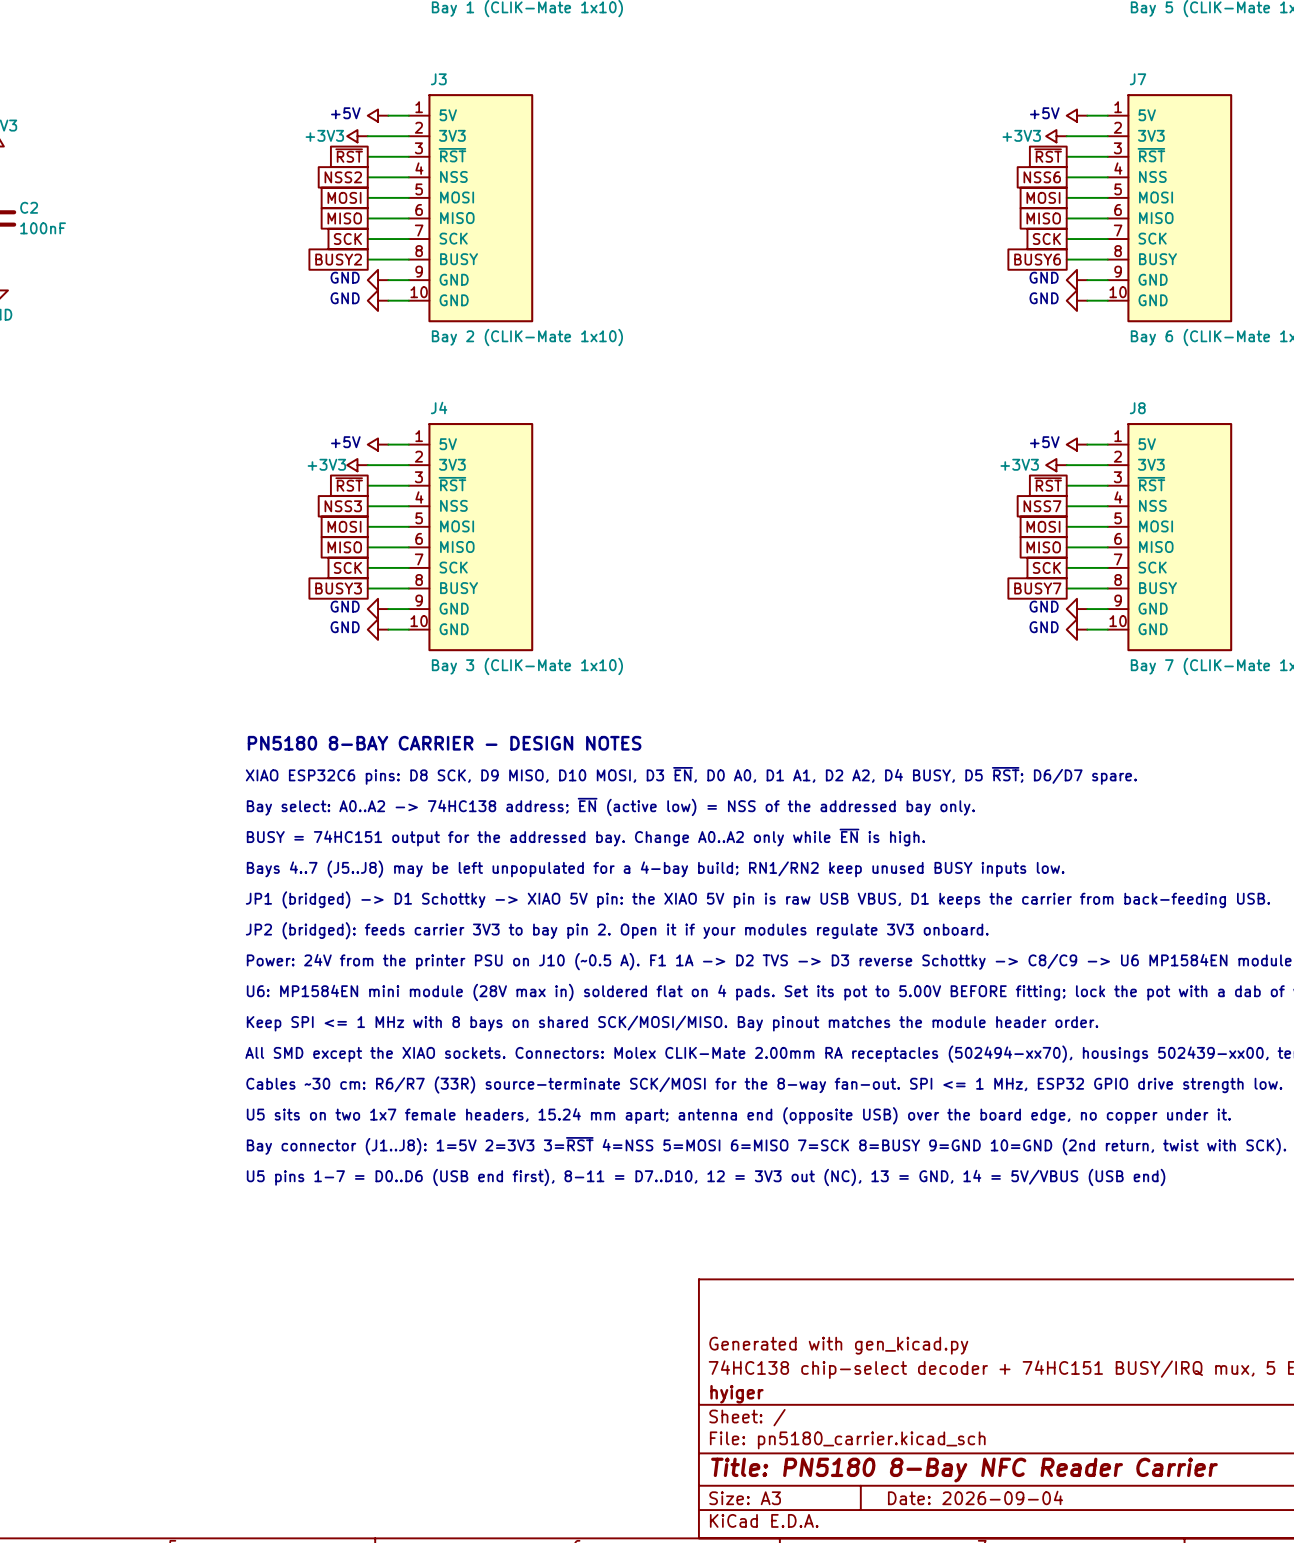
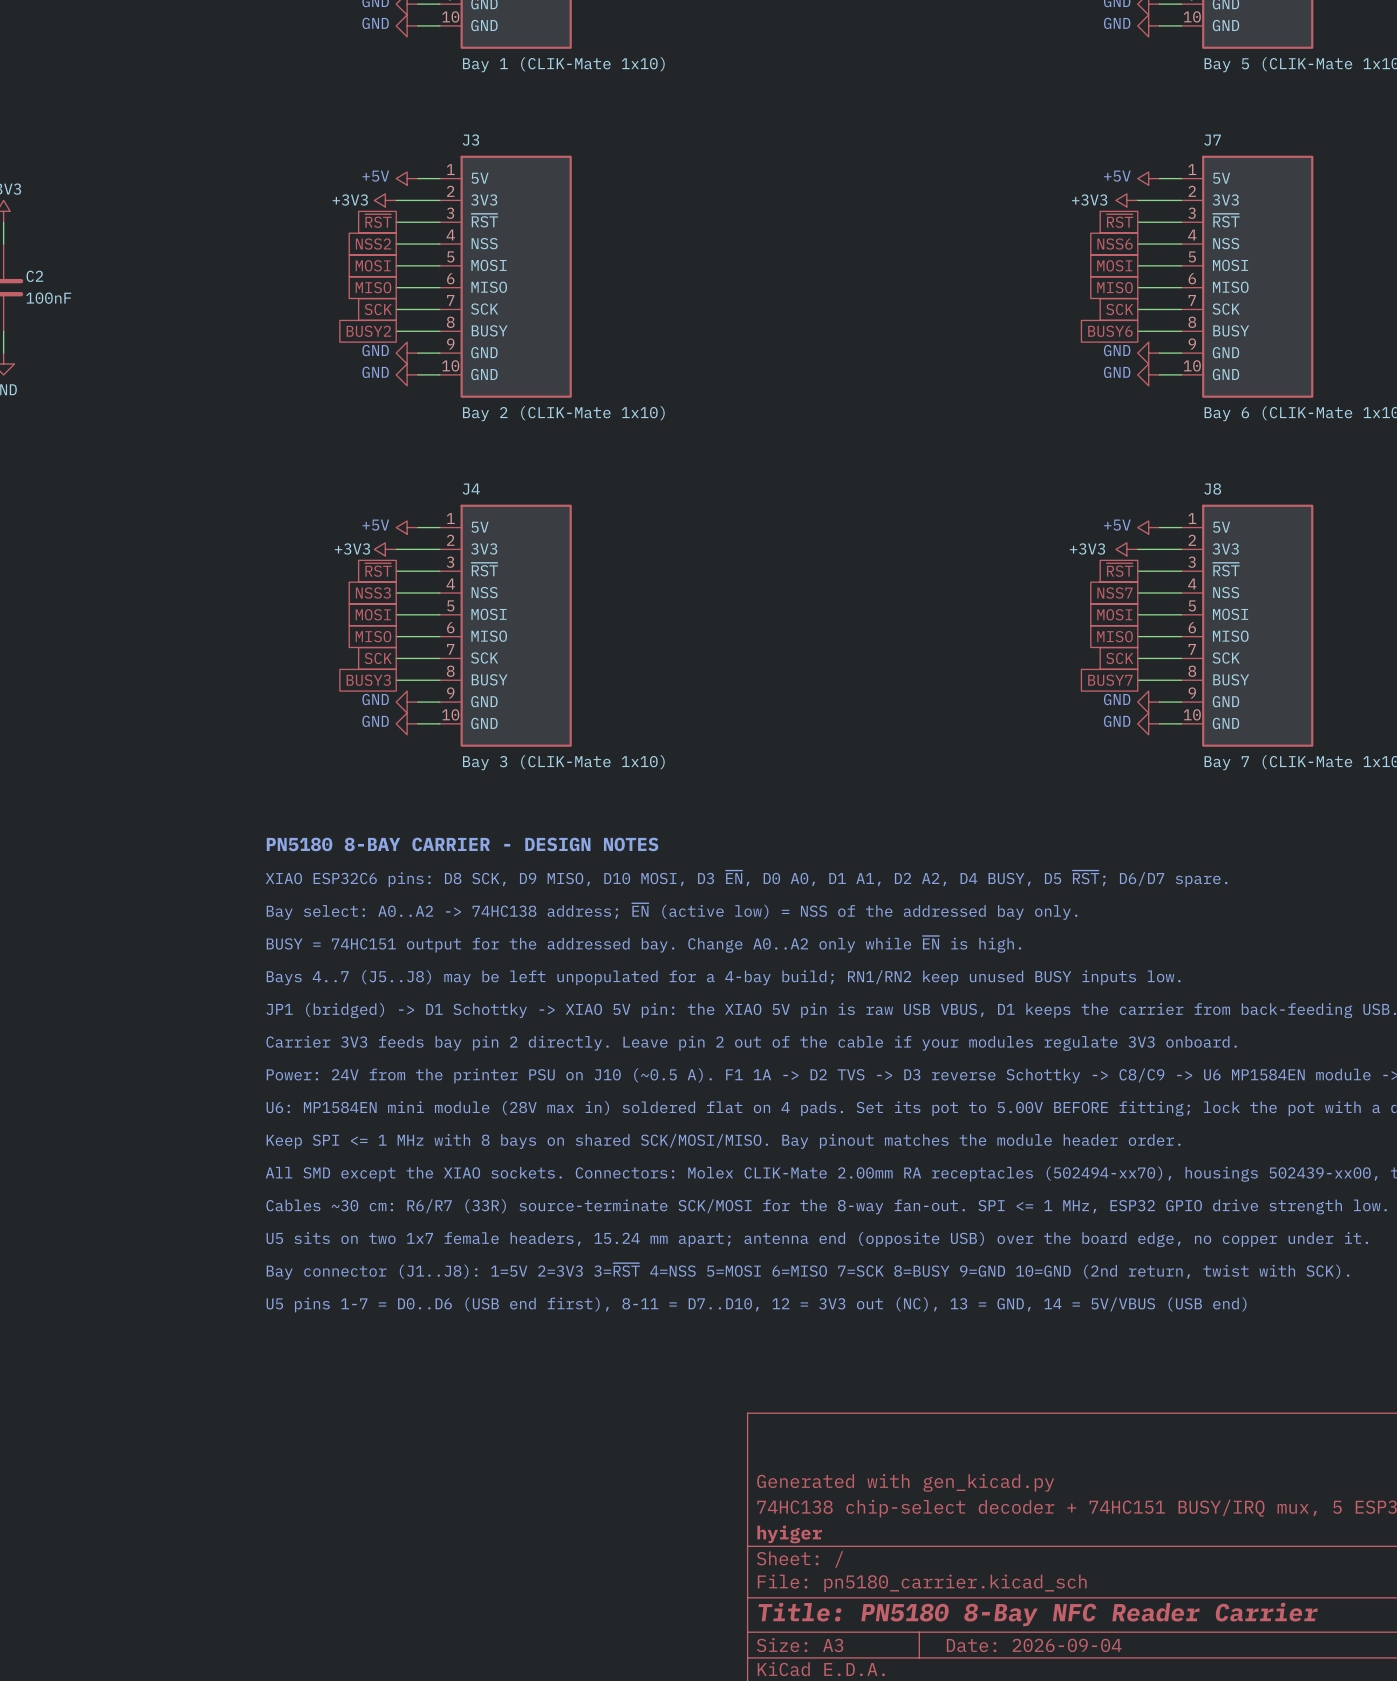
text: JP2 (bridged): feeds carrier 3V3 to bay pin 2. Open it if your modules regulate 3V3 onboard. (617, 930) -> Carrier 3V3 feeds bay pin 2 directly. Leave pin 2 out of the cable if your modules regulate 3V3 onboard. (751, 1043)

